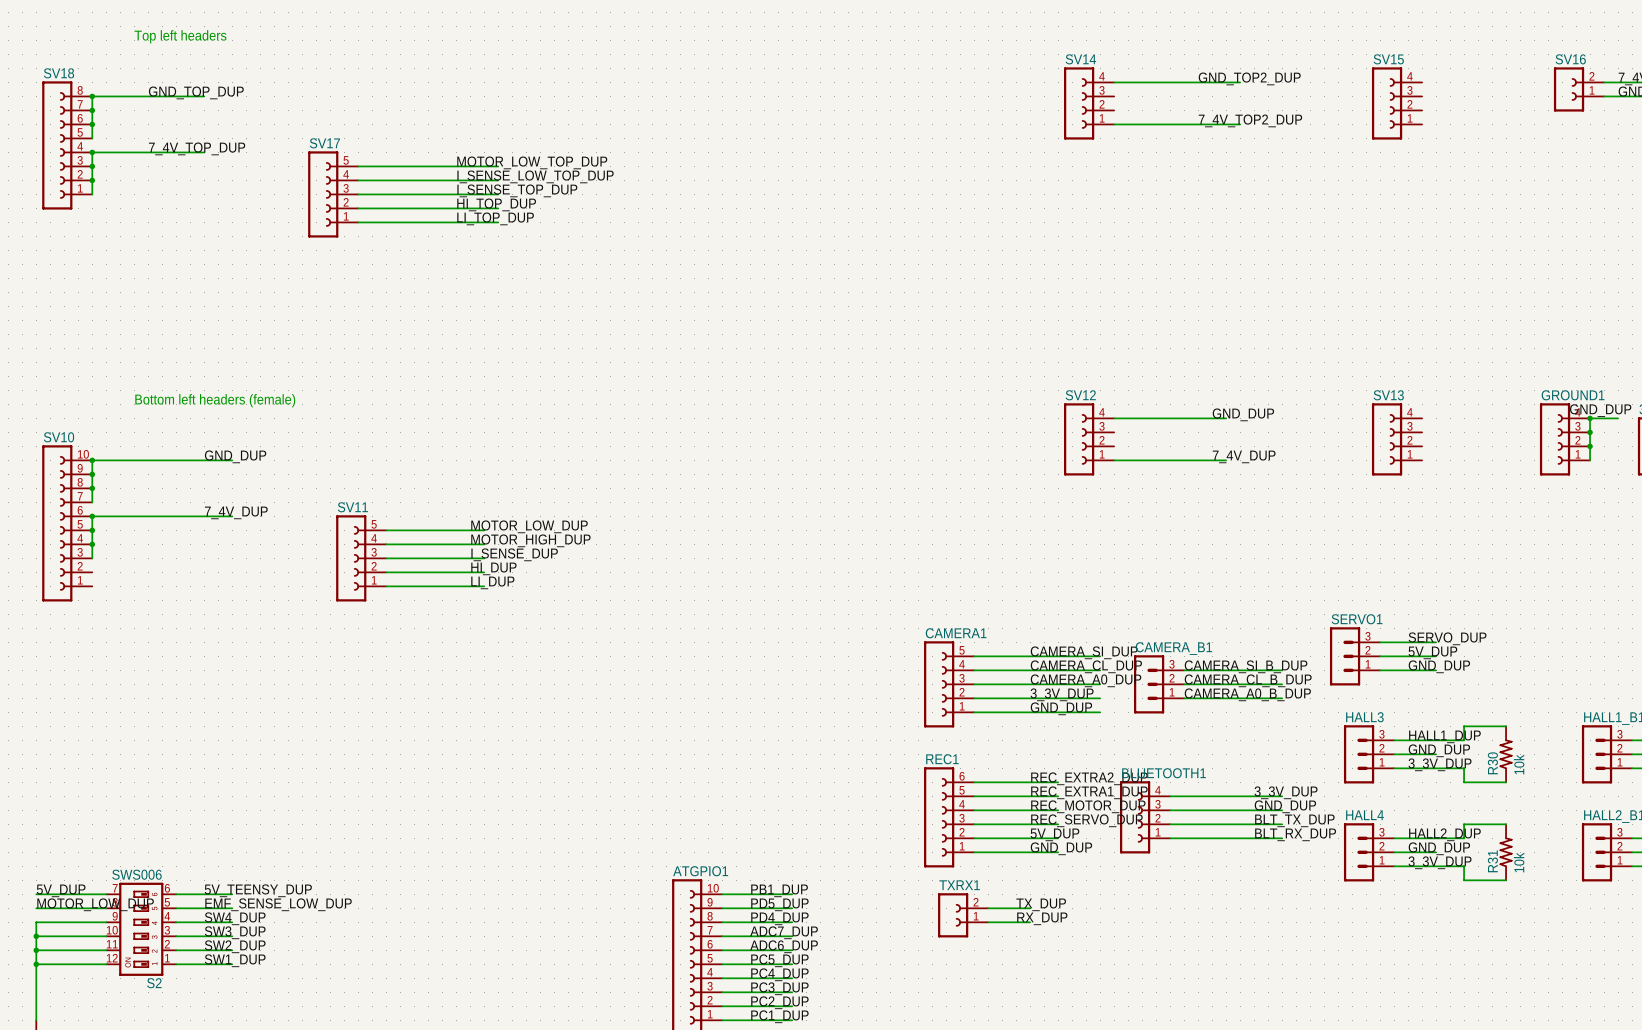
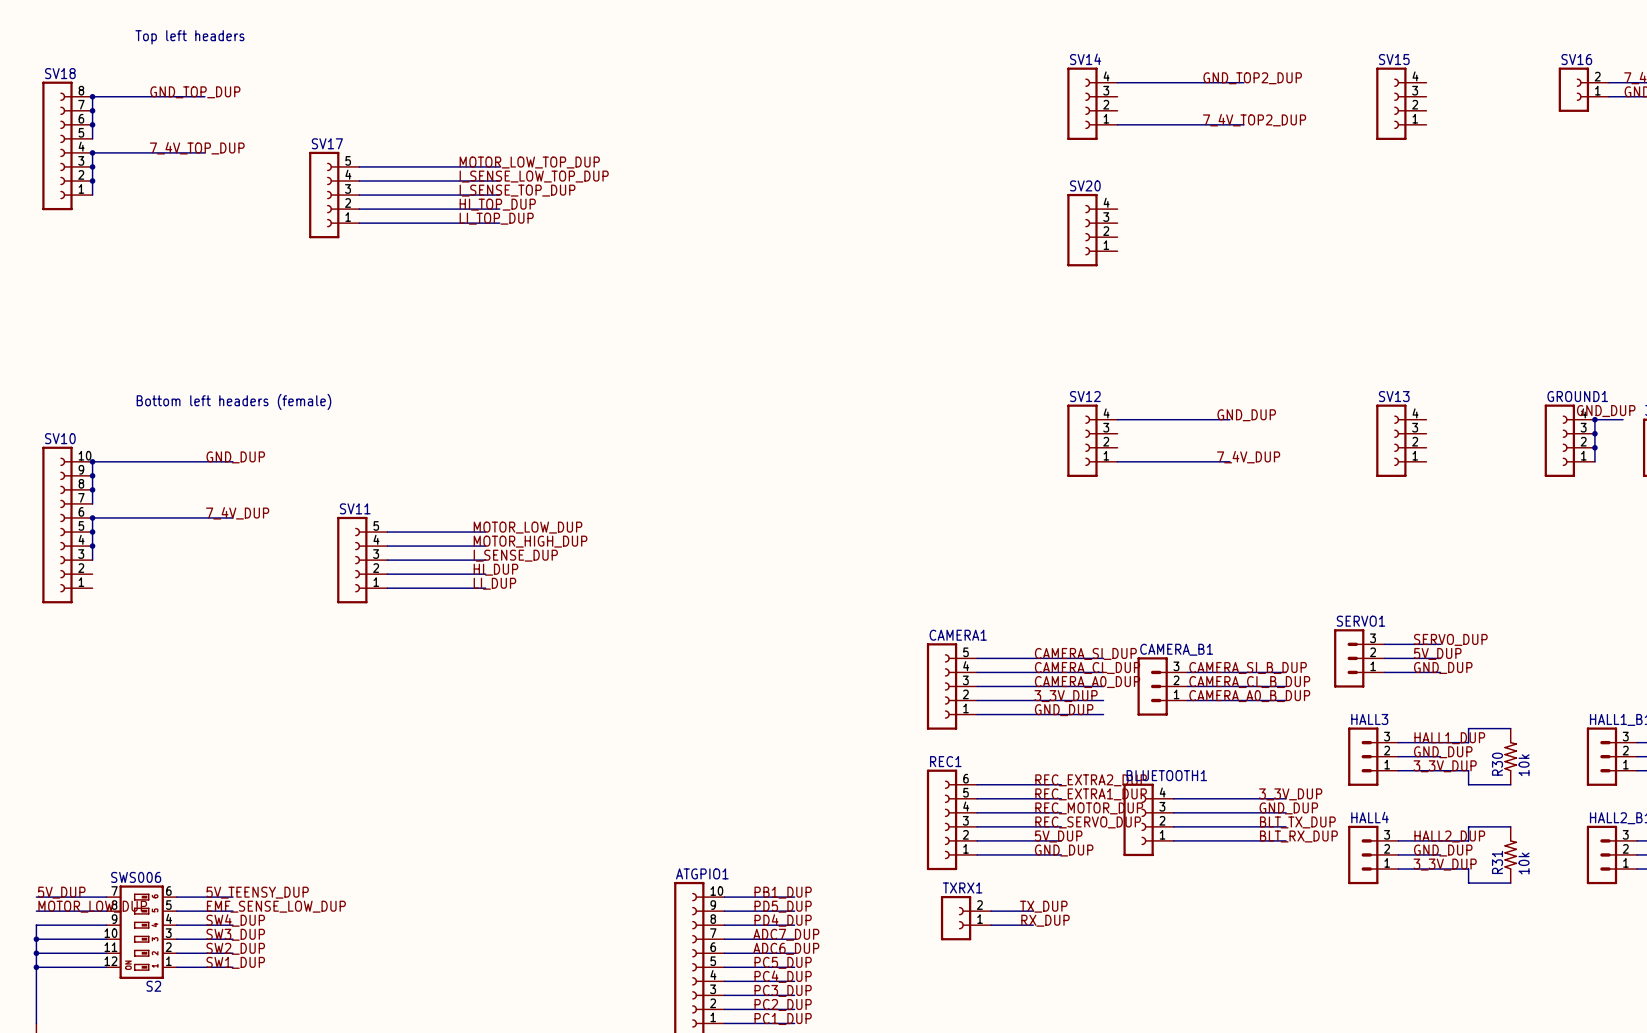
SV20: none -> (1092, 230)

